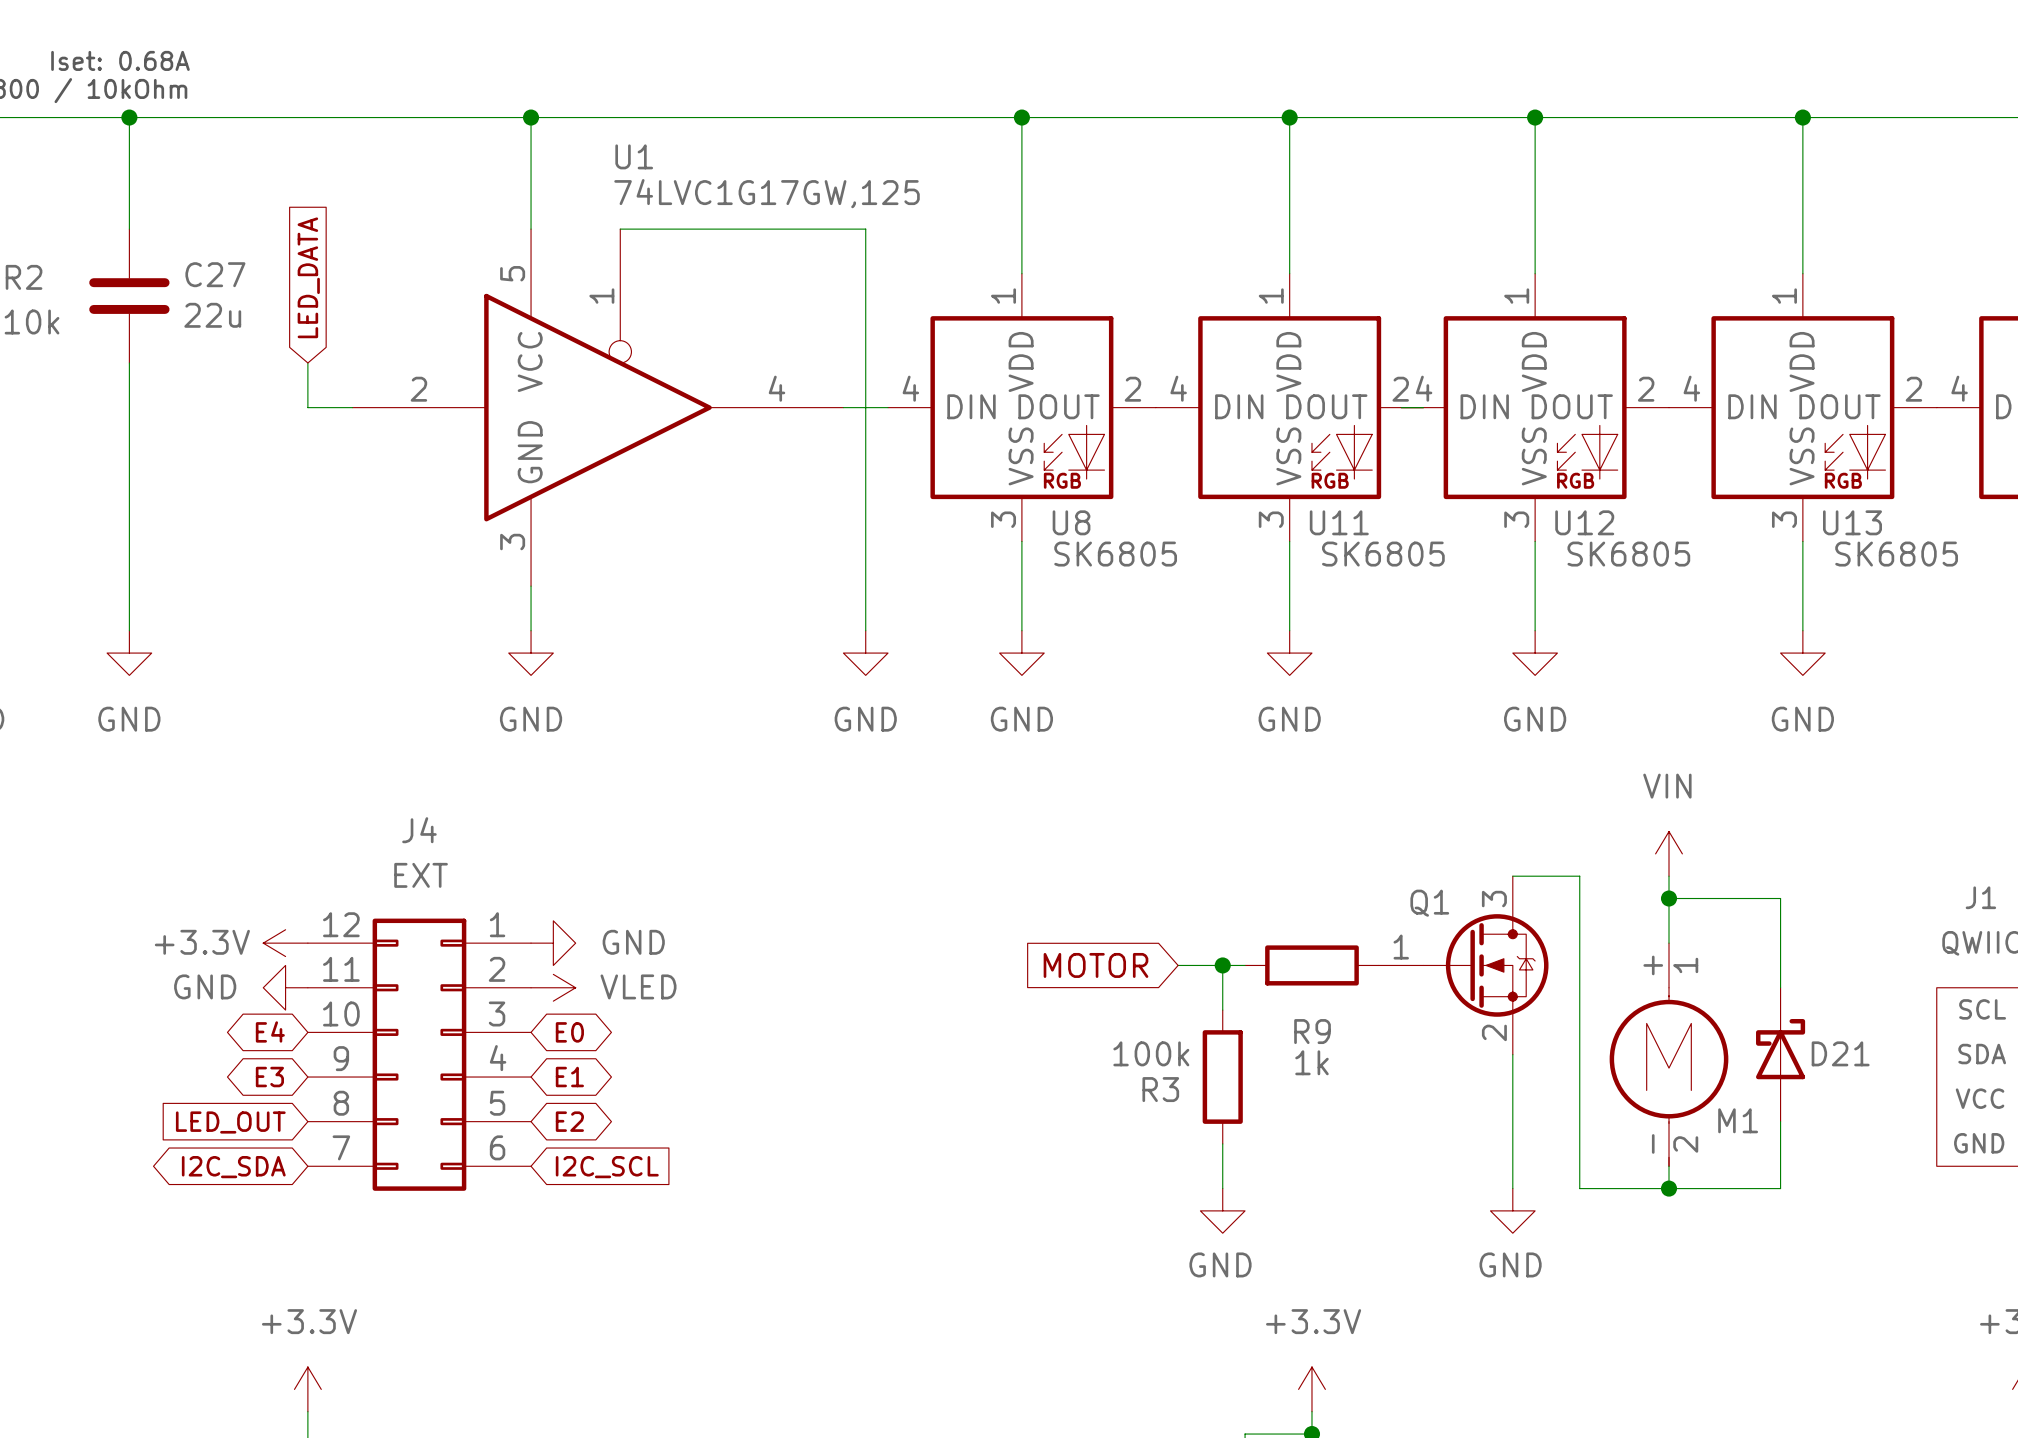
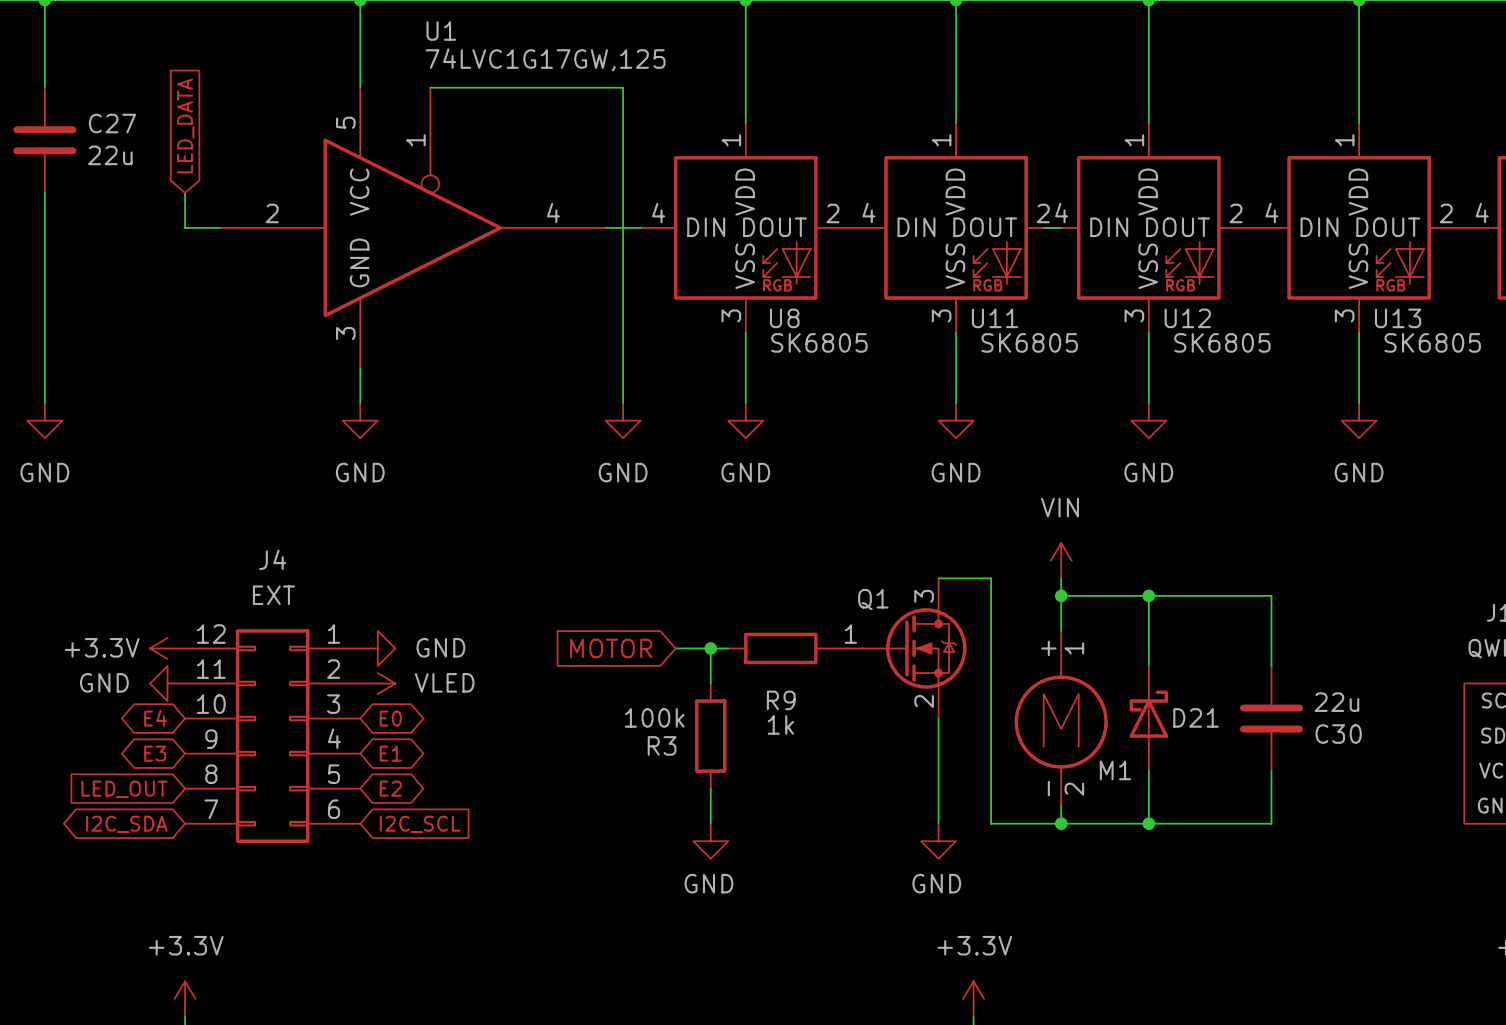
wire: none -> (938, 578) (991, 578) (991, 823) (1271, 823) (1271, 771)
power symbol position: VIN (1669, 853) -> VIN (1061, 560)
wire: none -> (1061, 595) (1131, 595)
junction: none -> (1061, 595)
wire: none -> (1148, 595) (1148, 665)
junction: none -> (1148, 595)
wire: (1579, 876) (1579, 1188) (1780, 1188) (1780, 1121) -> (1183, 595) (1271, 595) (1271, 665)
wire: (1669, 876) (1669, 943) -> (1061, 578) (1061, 630)
wire: (1669, 898) (1780, 898) (1780, 987) -> none
junction: (1669, 898) -> none
junction: none -> (710, 648)
global label position: MOTOR (1095, 965) -> MOTOR (611, 648)
wire: (1178, 965) (1245, 965) -> (675, 648) (728, 648)
wire: (1222, 965) (1222, 1010) -> (710, 648) (710, 683)
junction: (1222, 965) -> none
R9 position: (1311, 965) -> (780, 648)
Q1 position: (1463, 965) -> (899, 648)
C30: none -> 22u (1271, 718)
wire: (1512, 1054) (1512, 1188) -> (938, 718) (938, 823)
M1 position: (1669, 1054) -> (1061, 718)
D21 position: (1780, 1054) -> (1148, 718)
R3 position: (1222, 1077) -> (710, 736)
wire: none -> (1148, 771) (1148, 823)
wire: (1222, 1143) (1222, 1188) -> (710, 788) (710, 823)
junction: none -> (1061, 823)
junction: none -> (1148, 823)
wire: (1669, 1166) (1669, 1188) -> (1061, 806) (1061, 823)
power symbol: none -> GND (710, 841)
junction: (1669, 1188) -> none
power symbol position: GND (1222, 1210) -> GND (938, 841)
power symbol: GND (1512, 1210) -> none

